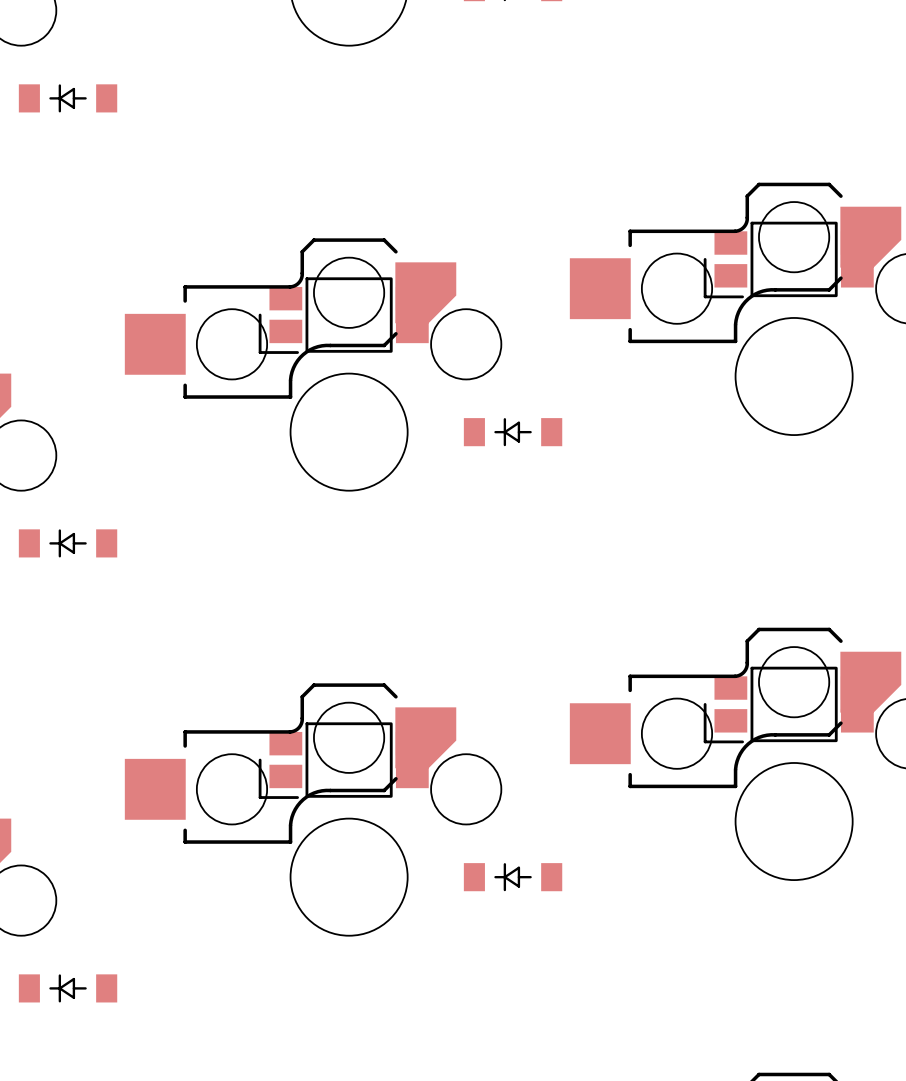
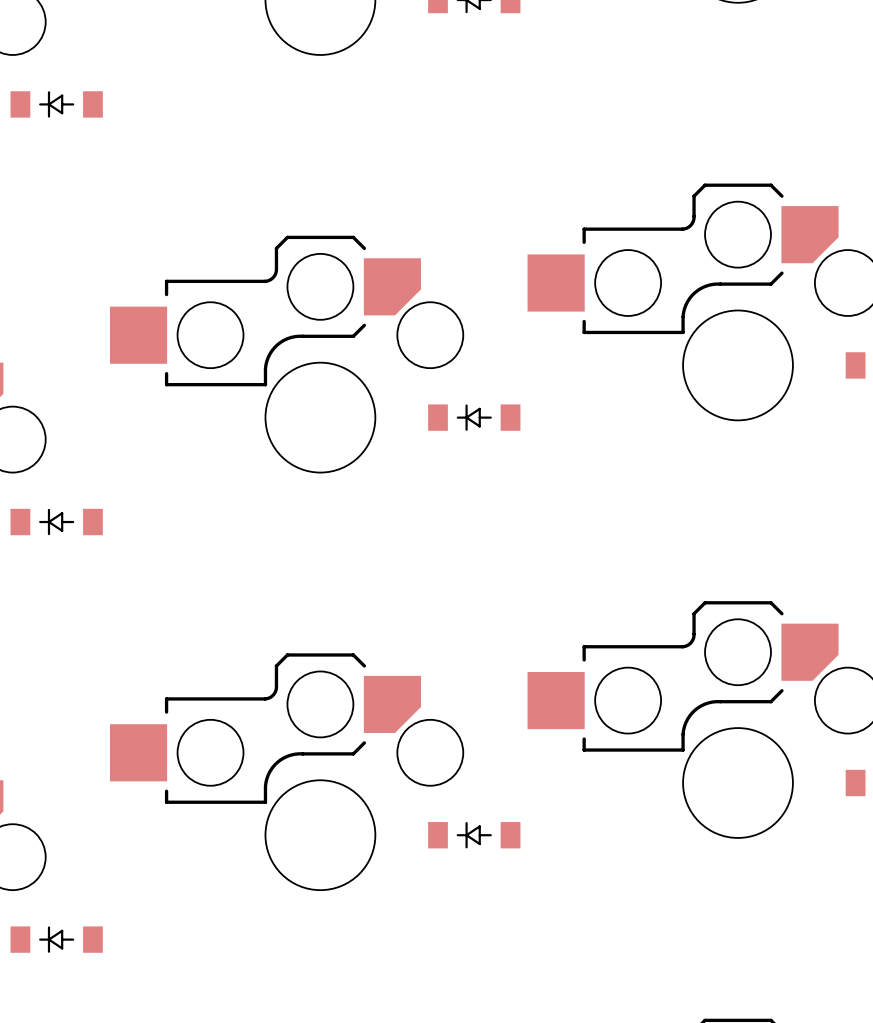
part: (788, 260) -> none
part: (343, 315) -> none
part: (788, 705) -> none
part: (343, 760) -> none

